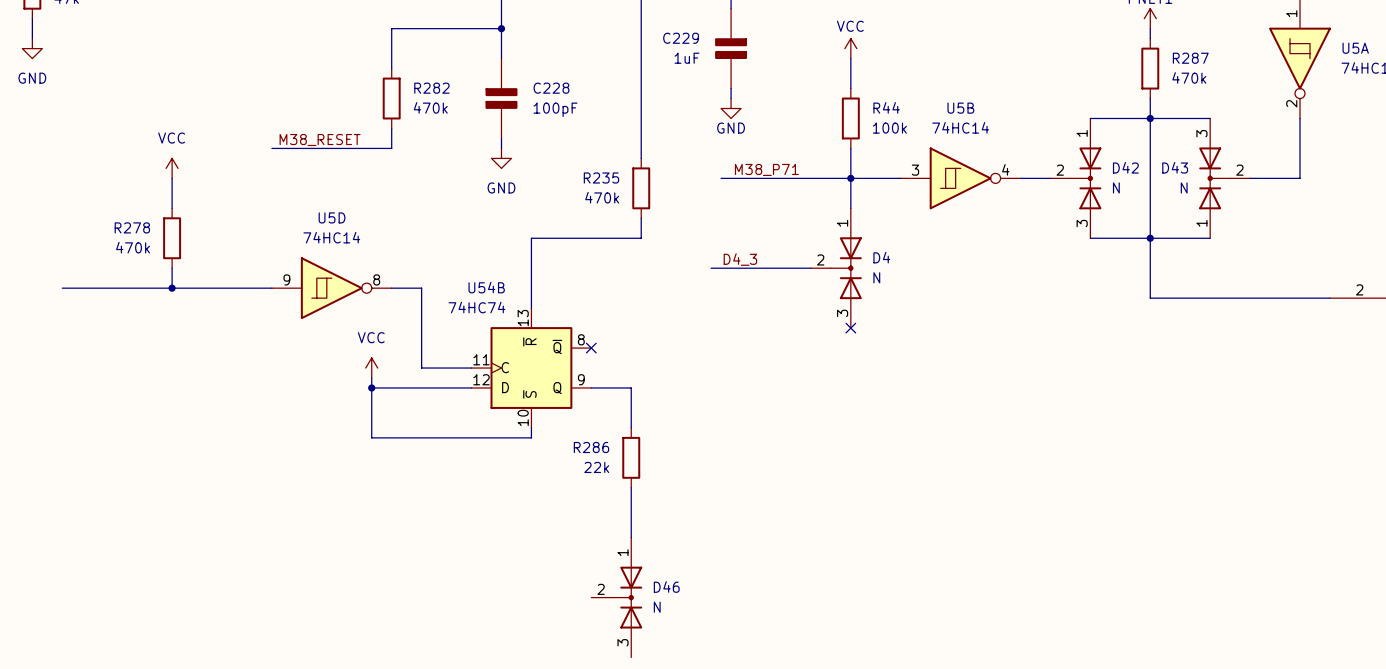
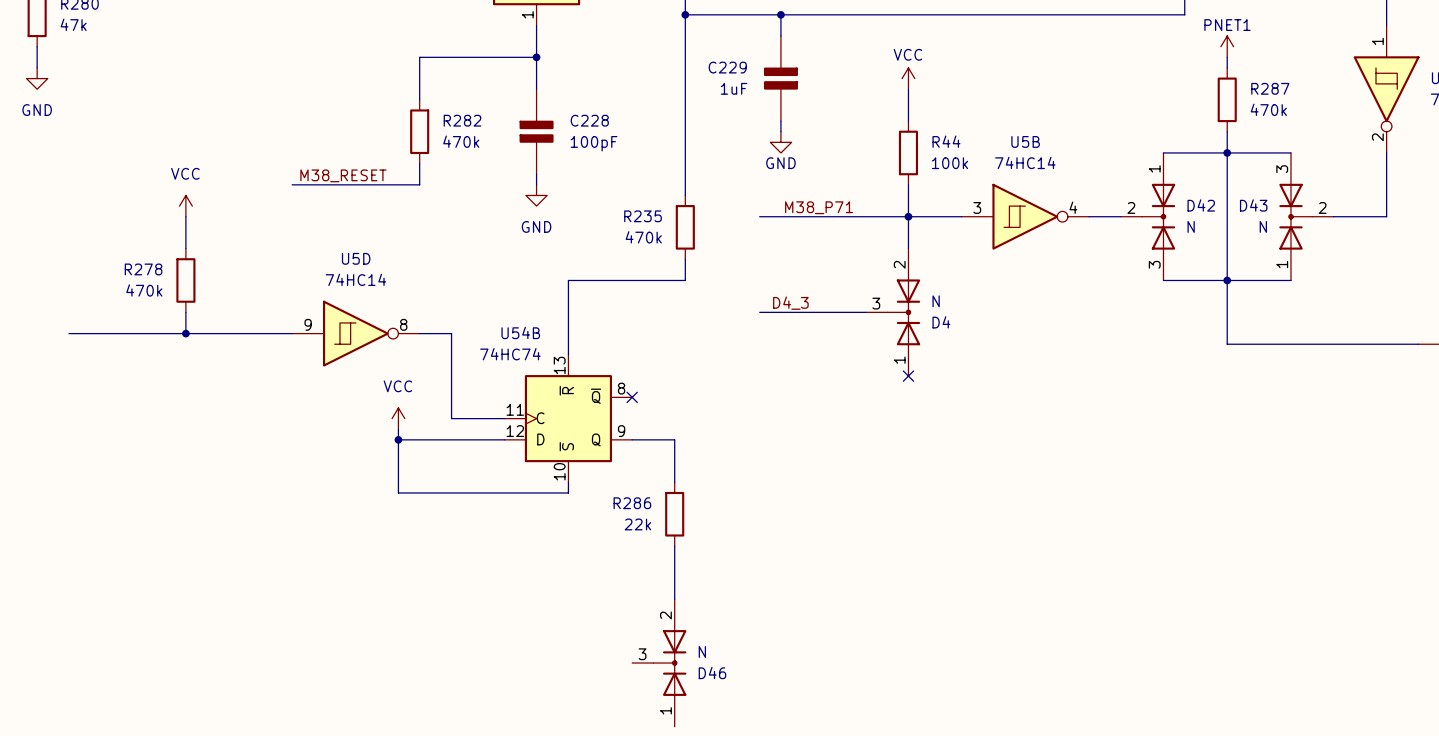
wire: none -> (759, 216) (770, 216)
D4 symbol: [810, 208, 862, 329] -> [865, 248, 921, 377]
D4 name position: D4 (881, 257) -> D4 (941, 322)
D4 value position: N (876, 277) -> N (936, 301)
D46 symbol: [591, 537, 643, 658] -> [632, 599, 687, 727]
D46 name position: D46 (666, 587) -> D46 (712, 672)
D46 value position: N (657, 607) -> N (702, 651)

